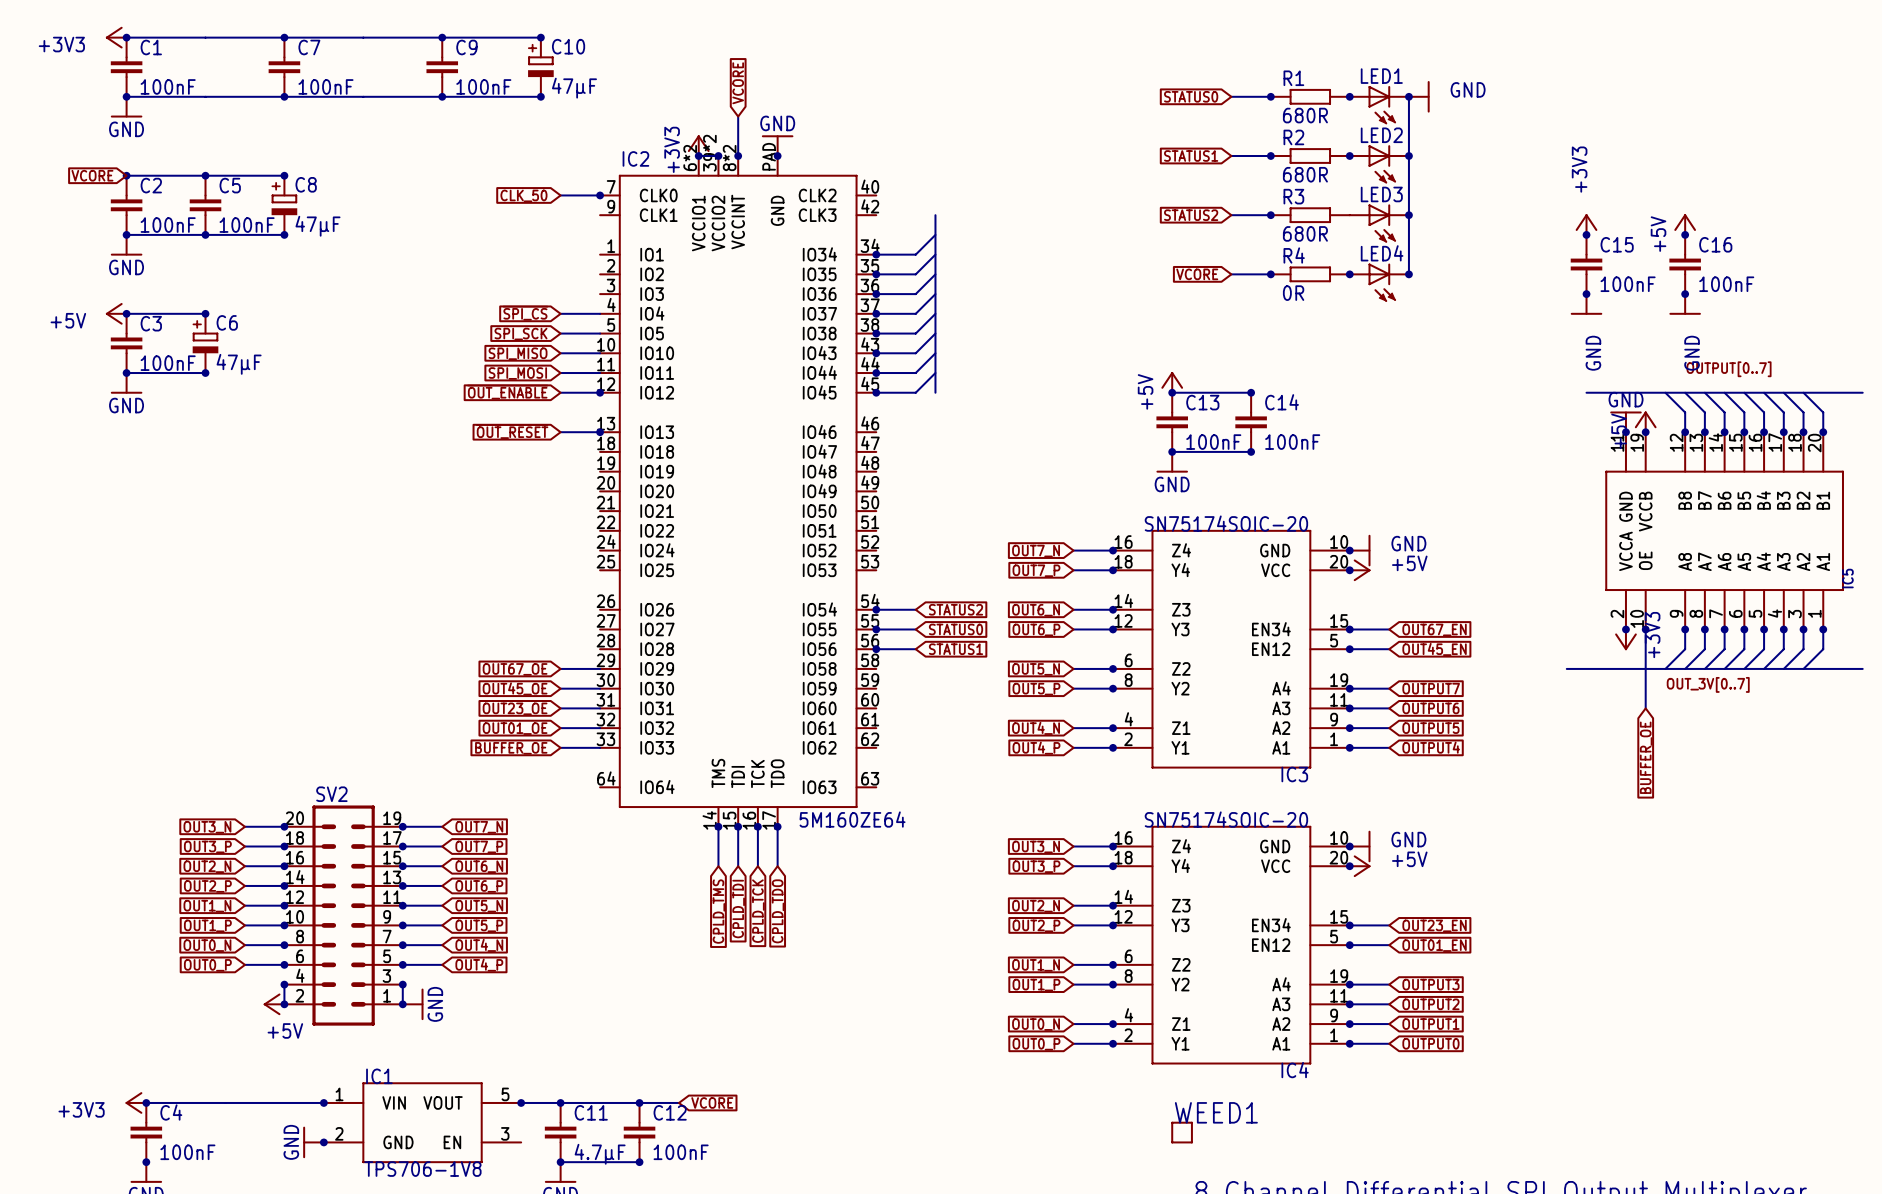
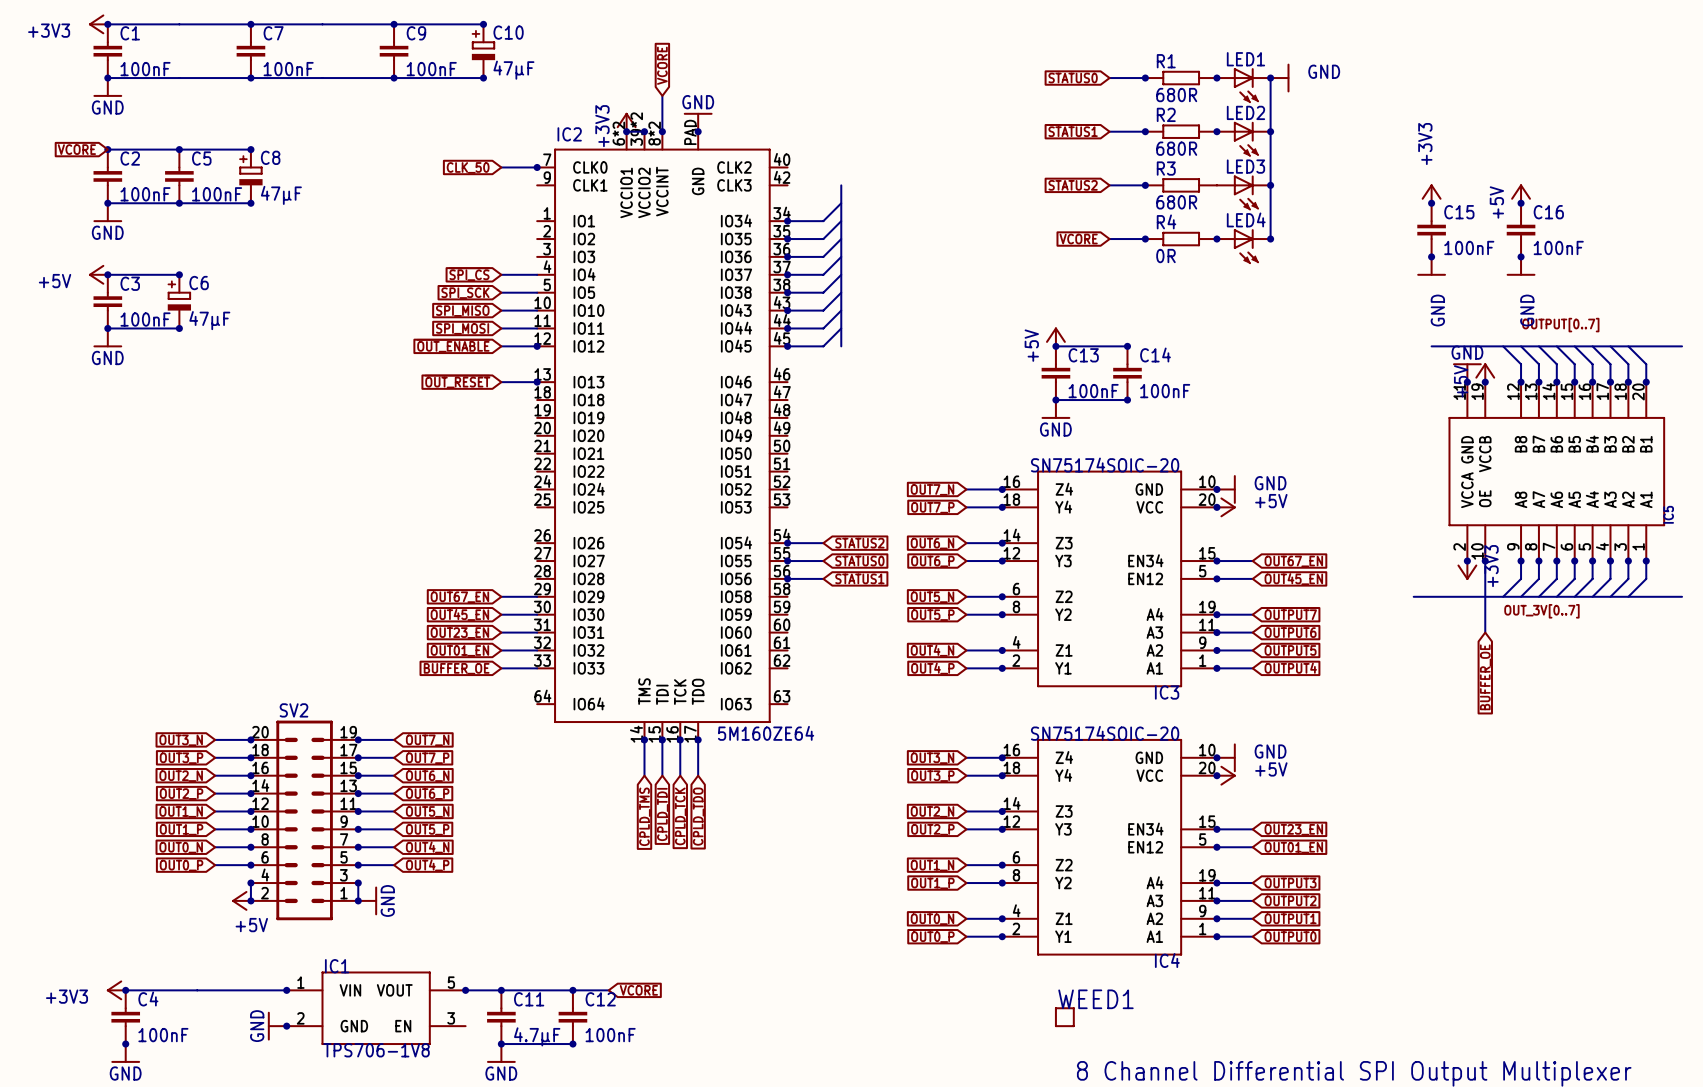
global label: OUT67_OE (515, 669) -> OUT67_EN (459, 597)
global label: OUT45_OE (515, 688) -> OUT45_EN (459, 614)
global label: OUT23_OE (515, 708) -> OUT23_EN (459, 633)
global label: OUT01_OE (515, 728) -> OUT01_EN (459, 650)

